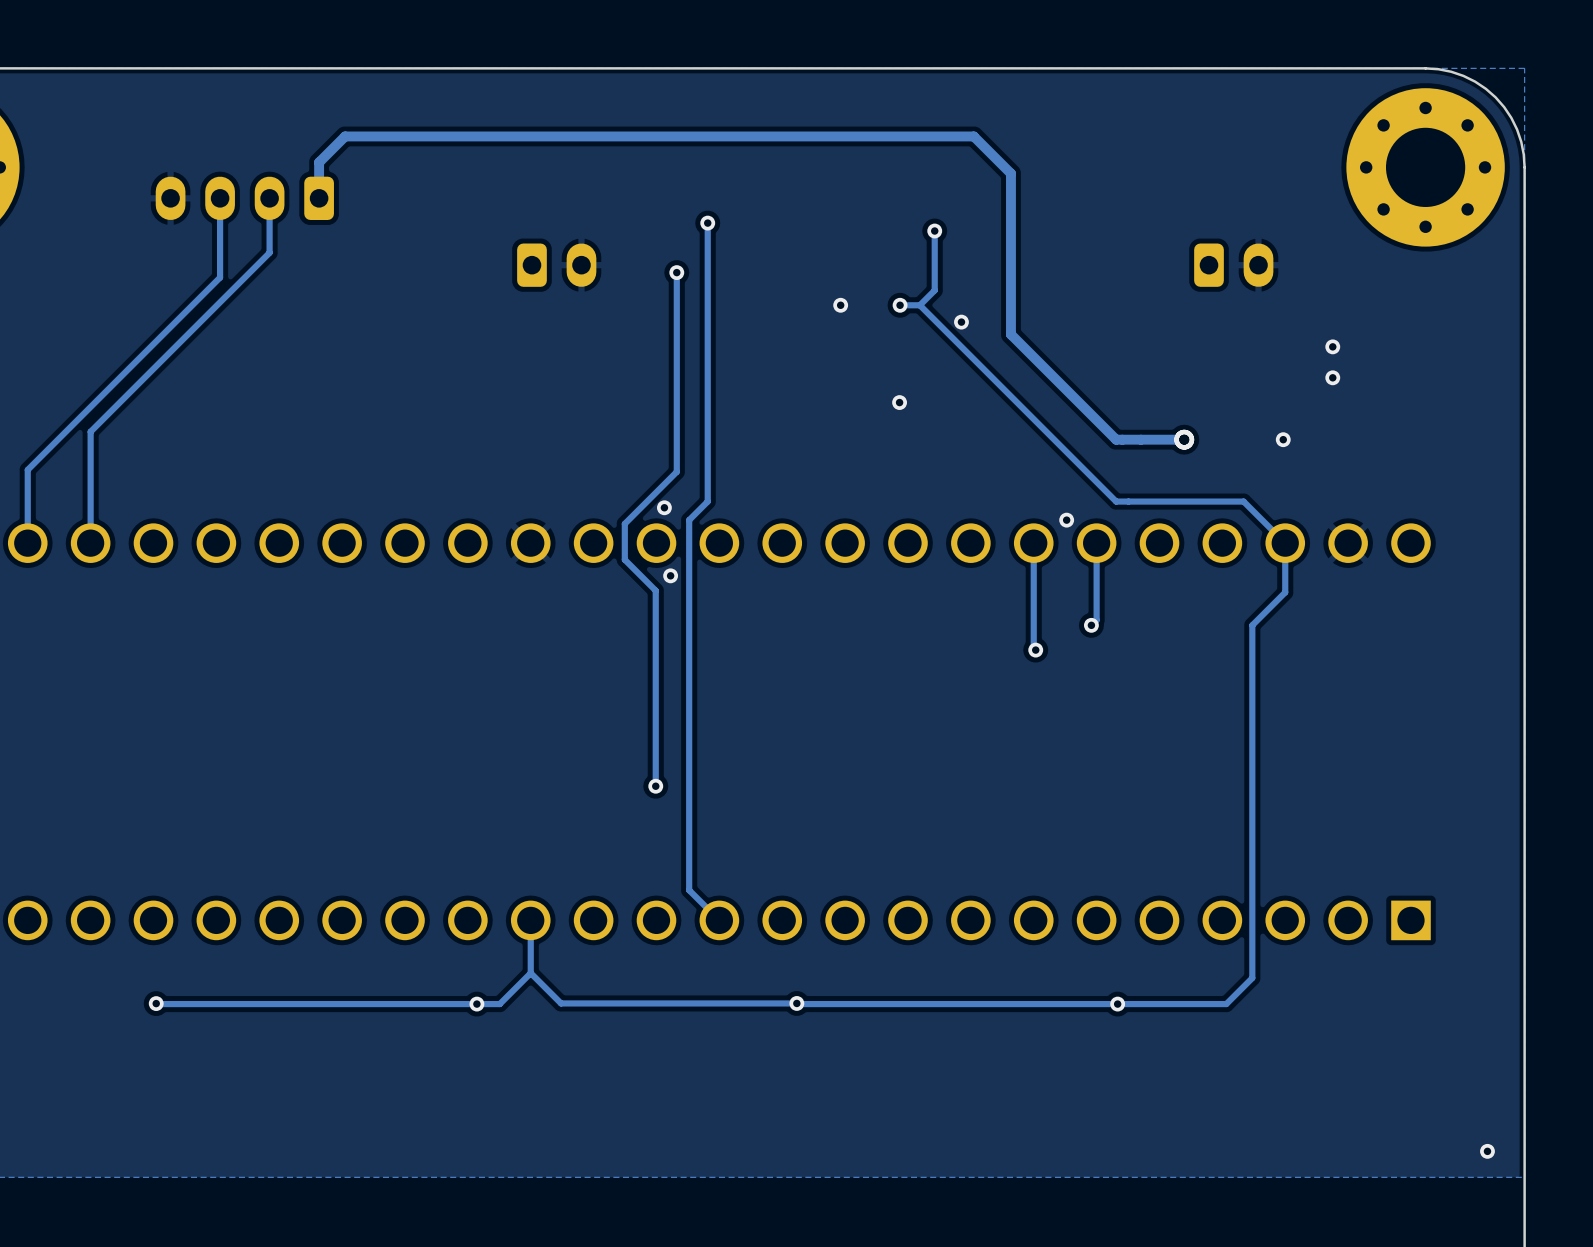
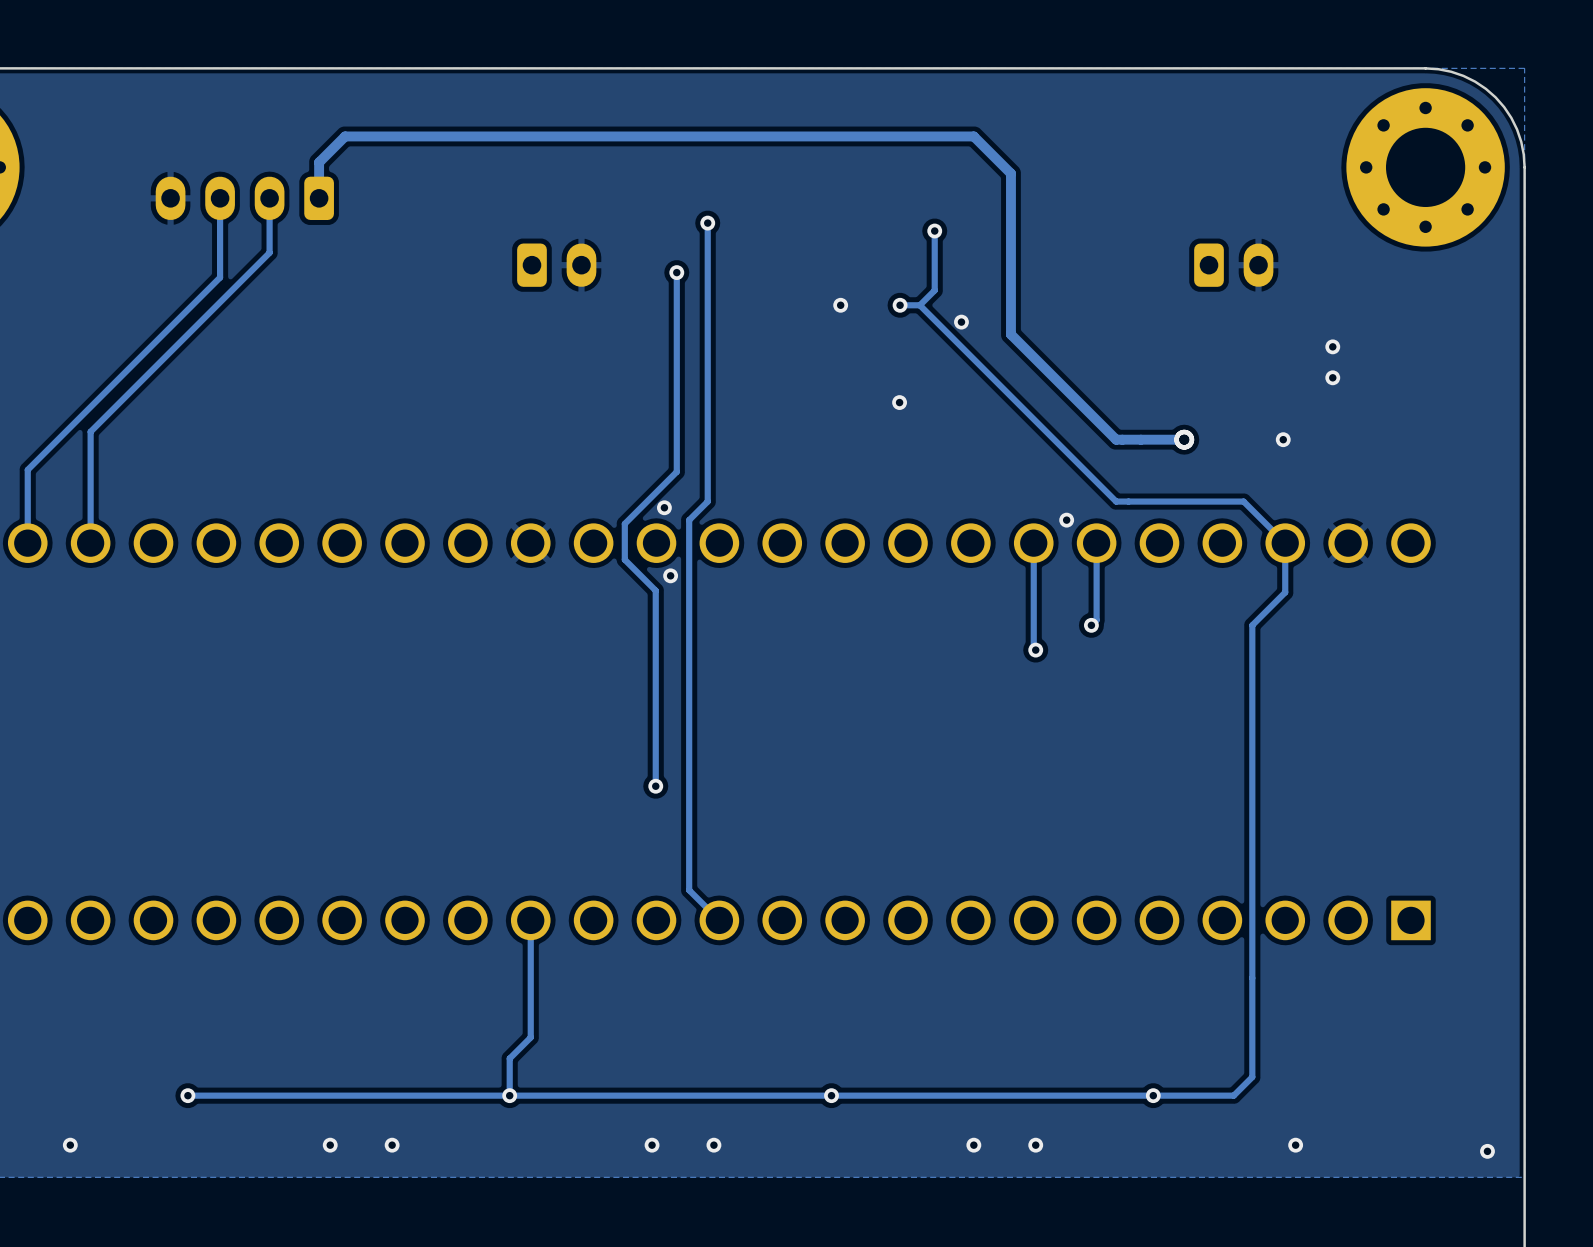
track: none -> (530, 973) (530, 1037) (509, 1058) (509, 1095)
track: (1252, 978) (1226, 1004) (561, 1003) (530, 973) (499, 1004) (156, 1003) -> (1252, 978) (1252, 1077) (1233, 1095) (187, 1095)
via: (156, 1003) -> none
via: (796, 1003) -> none
via: (476, 1004) -> none
via: (1117, 1004) -> none
via: none -> (187, 1095)
via: none -> (509, 1095)
via: none -> (831, 1095)
via: none -> (1153, 1095)
via: none -> (70, 1145)
via: none -> (330, 1145)
via: none -> (392, 1145)
via: none -> (652, 1145)
via: none -> (713, 1145)
via: none -> (973, 1145)
via: none -> (1035, 1145)
via: none -> (1295, 1145)

